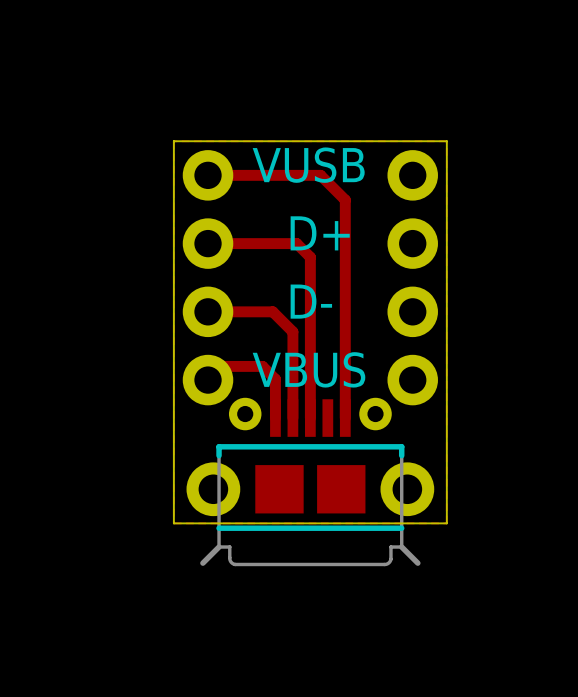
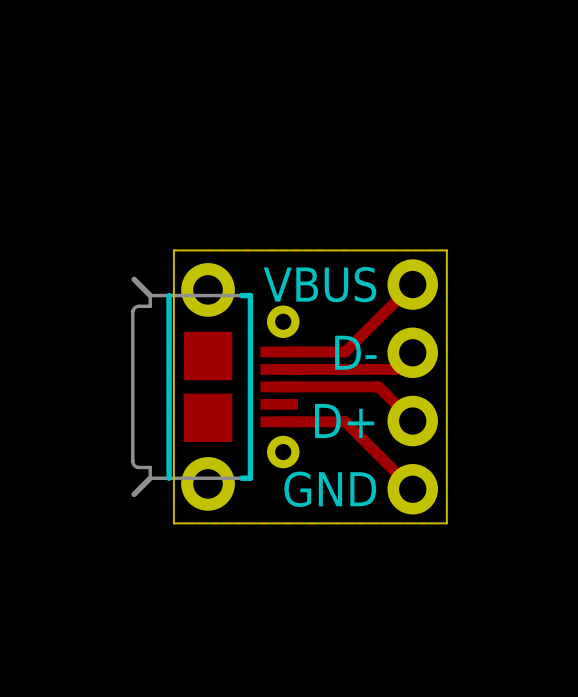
text: VUSB (308, 165) -> none
track: (208, 175) (320, 175) (345, 200) (345, 418) -> none
text position: D+ (320, 233) -> D+ (344, 421)
track: (208, 243) (296, 243) (310, 257) (310, 418) -> none
board edge: (173, 250) (173, 141) (446, 141) (446, 250) -> (173, 250) (446, 250)
part: (208, 277) -> none
part position: (412, 277) -> (412, 386)
track: none -> (412, 284) (345, 351) (279, 351)
text position: D- (311, 301) -> D- (355, 352)
track: (208, 311) (272, 311) (292, 331) (292, 418) -> none
track: none -> (412, 352) (396, 369) (279, 369)
text position: VBUS (309, 369) -> VBUS (319, 284)
track: (208, 380) (221, 366) (262, 366) (275, 379) (275, 418) -> none
track: none -> (279, 386) (378, 386) (412, 421)
track: none -> (279, 421) (345, 421) (412, 489)
part rotation: 0° (310, 481) -> 90° clockwise (215, 386)
text: none -> GND (330, 489)

